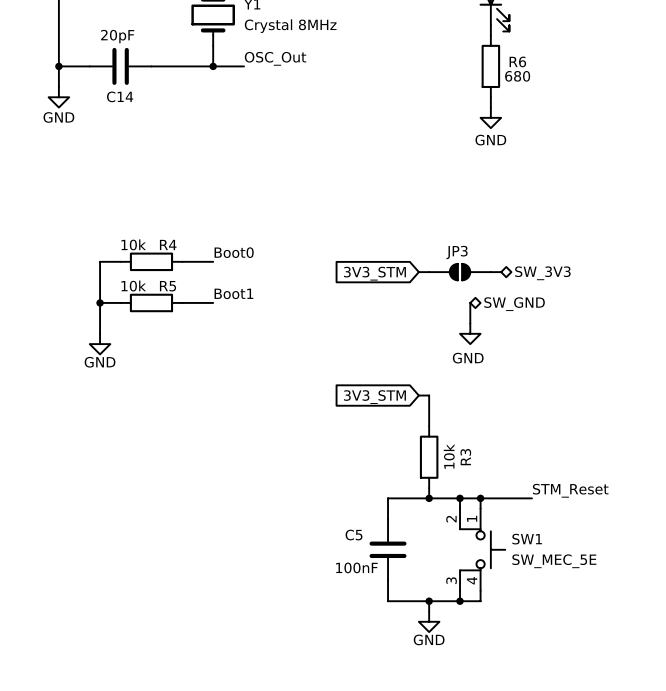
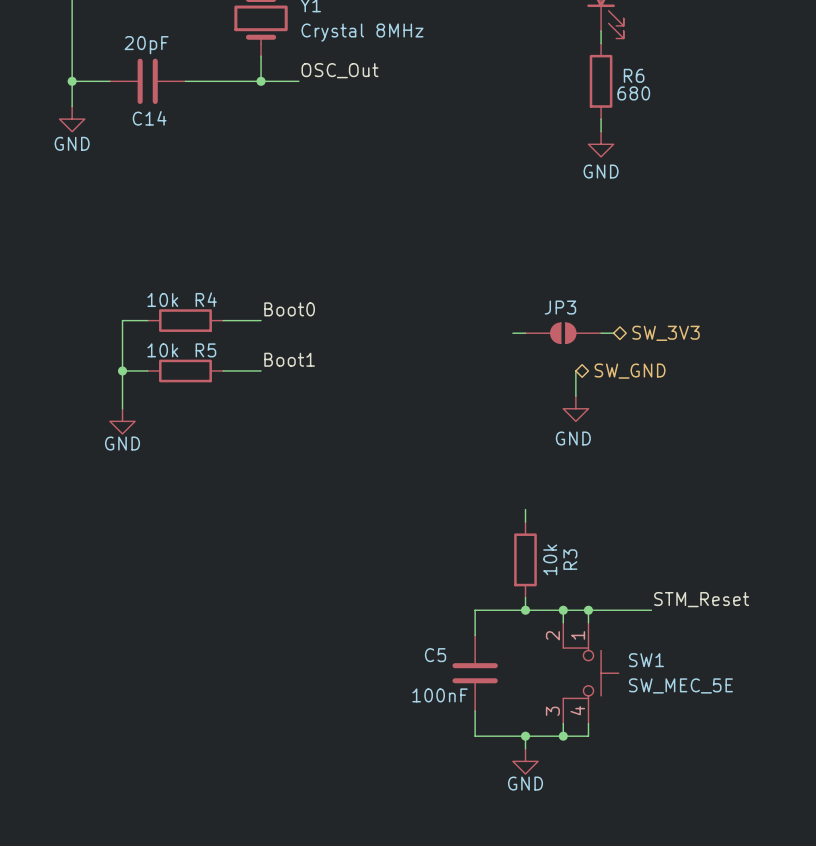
global label: 3V3_STM (374, 273) -> none
wire: (418, 395) (429, 395) (429, 416) -> none
global label: 3V3_STM (374, 397) -> none

